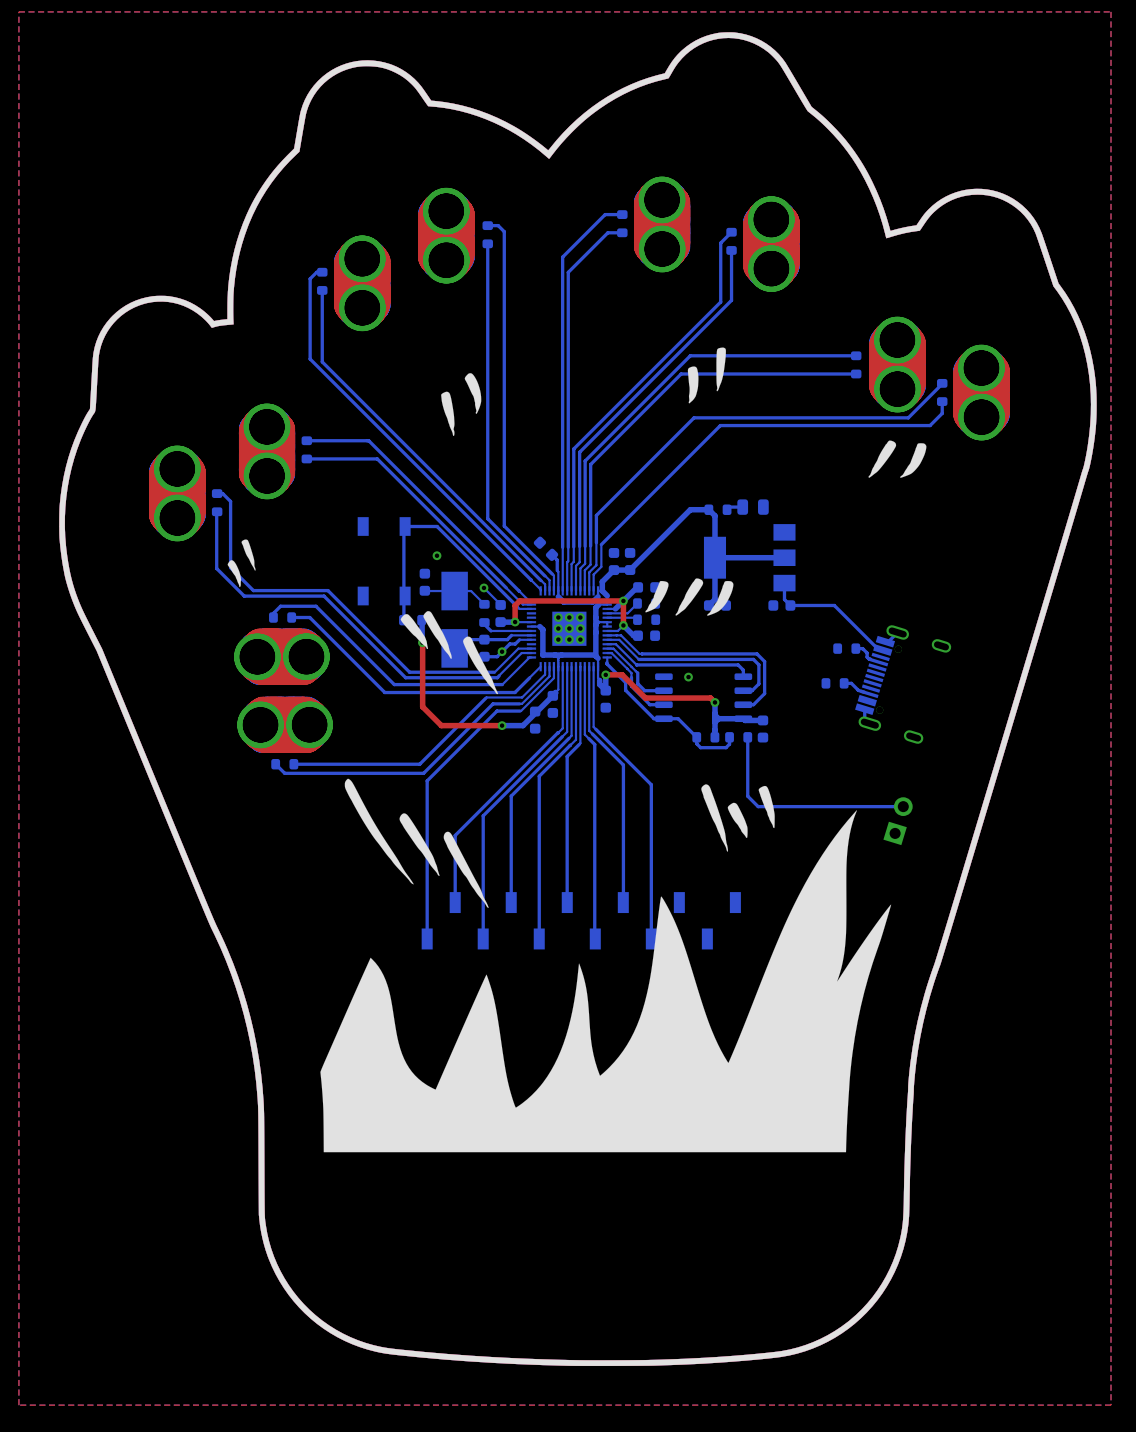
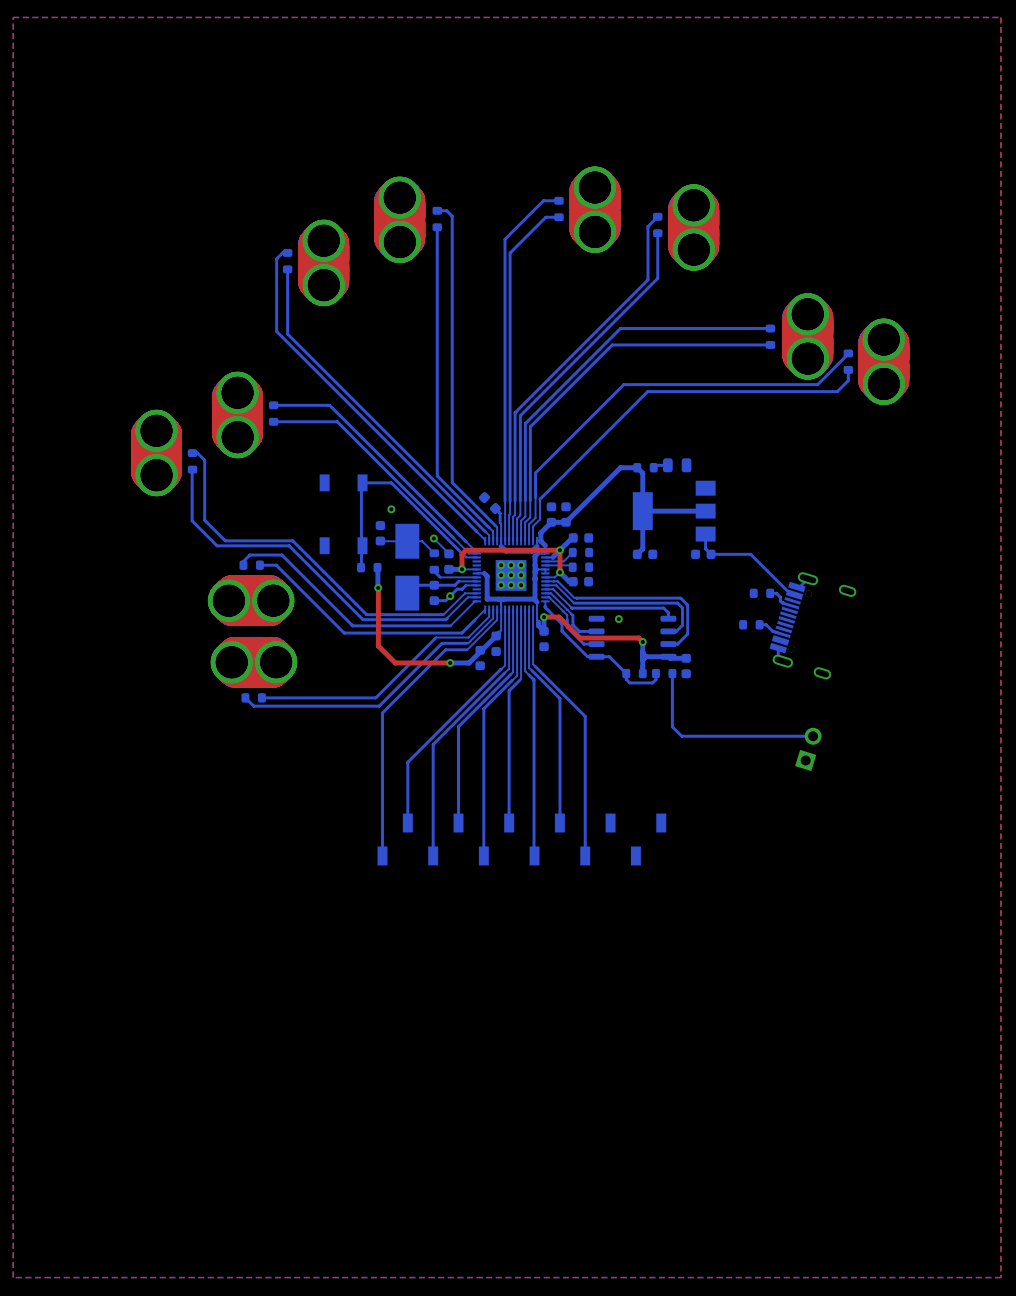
drawing: [59, 32, 1097, 1366] -> none

